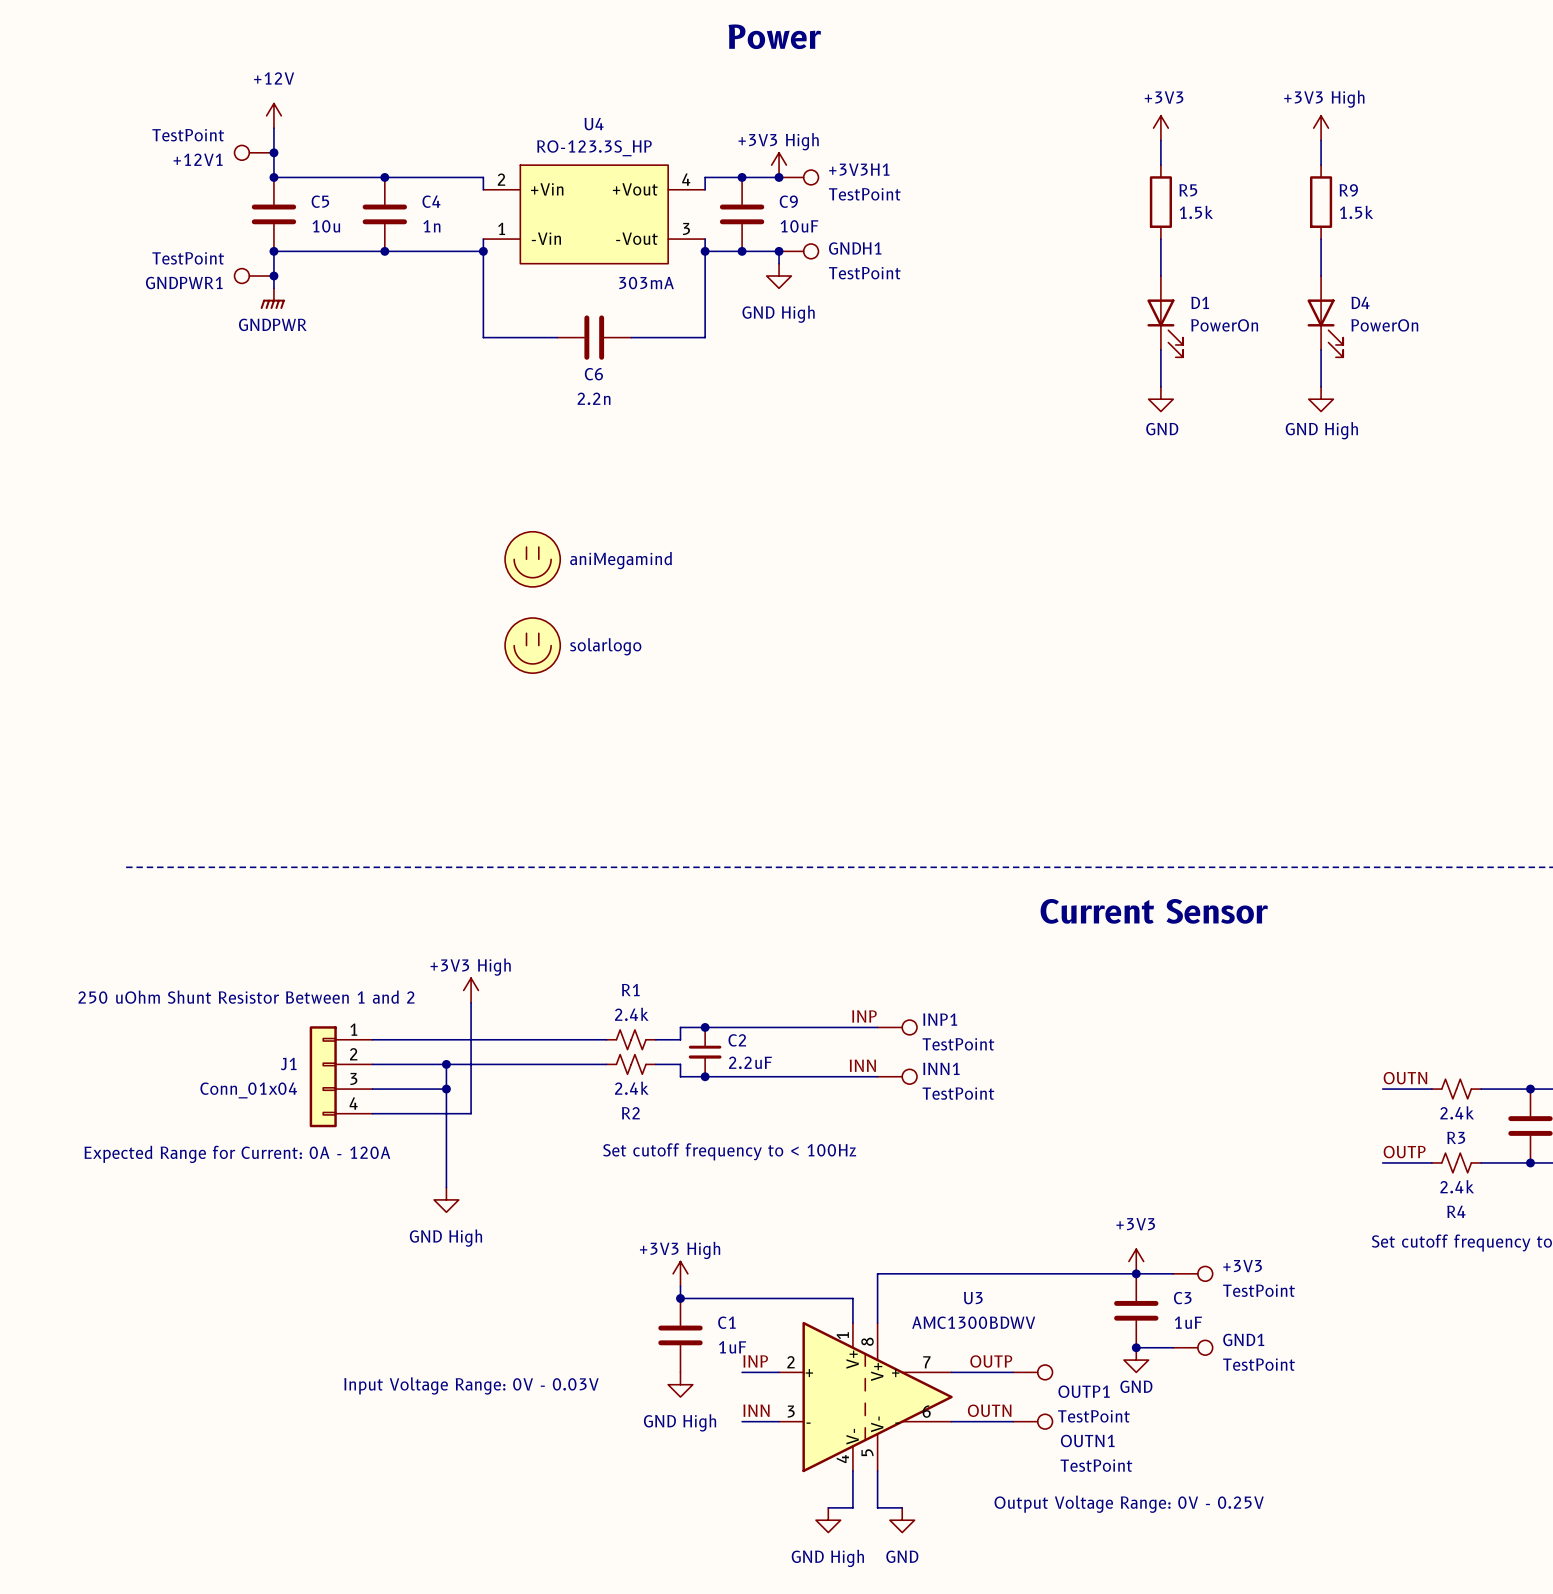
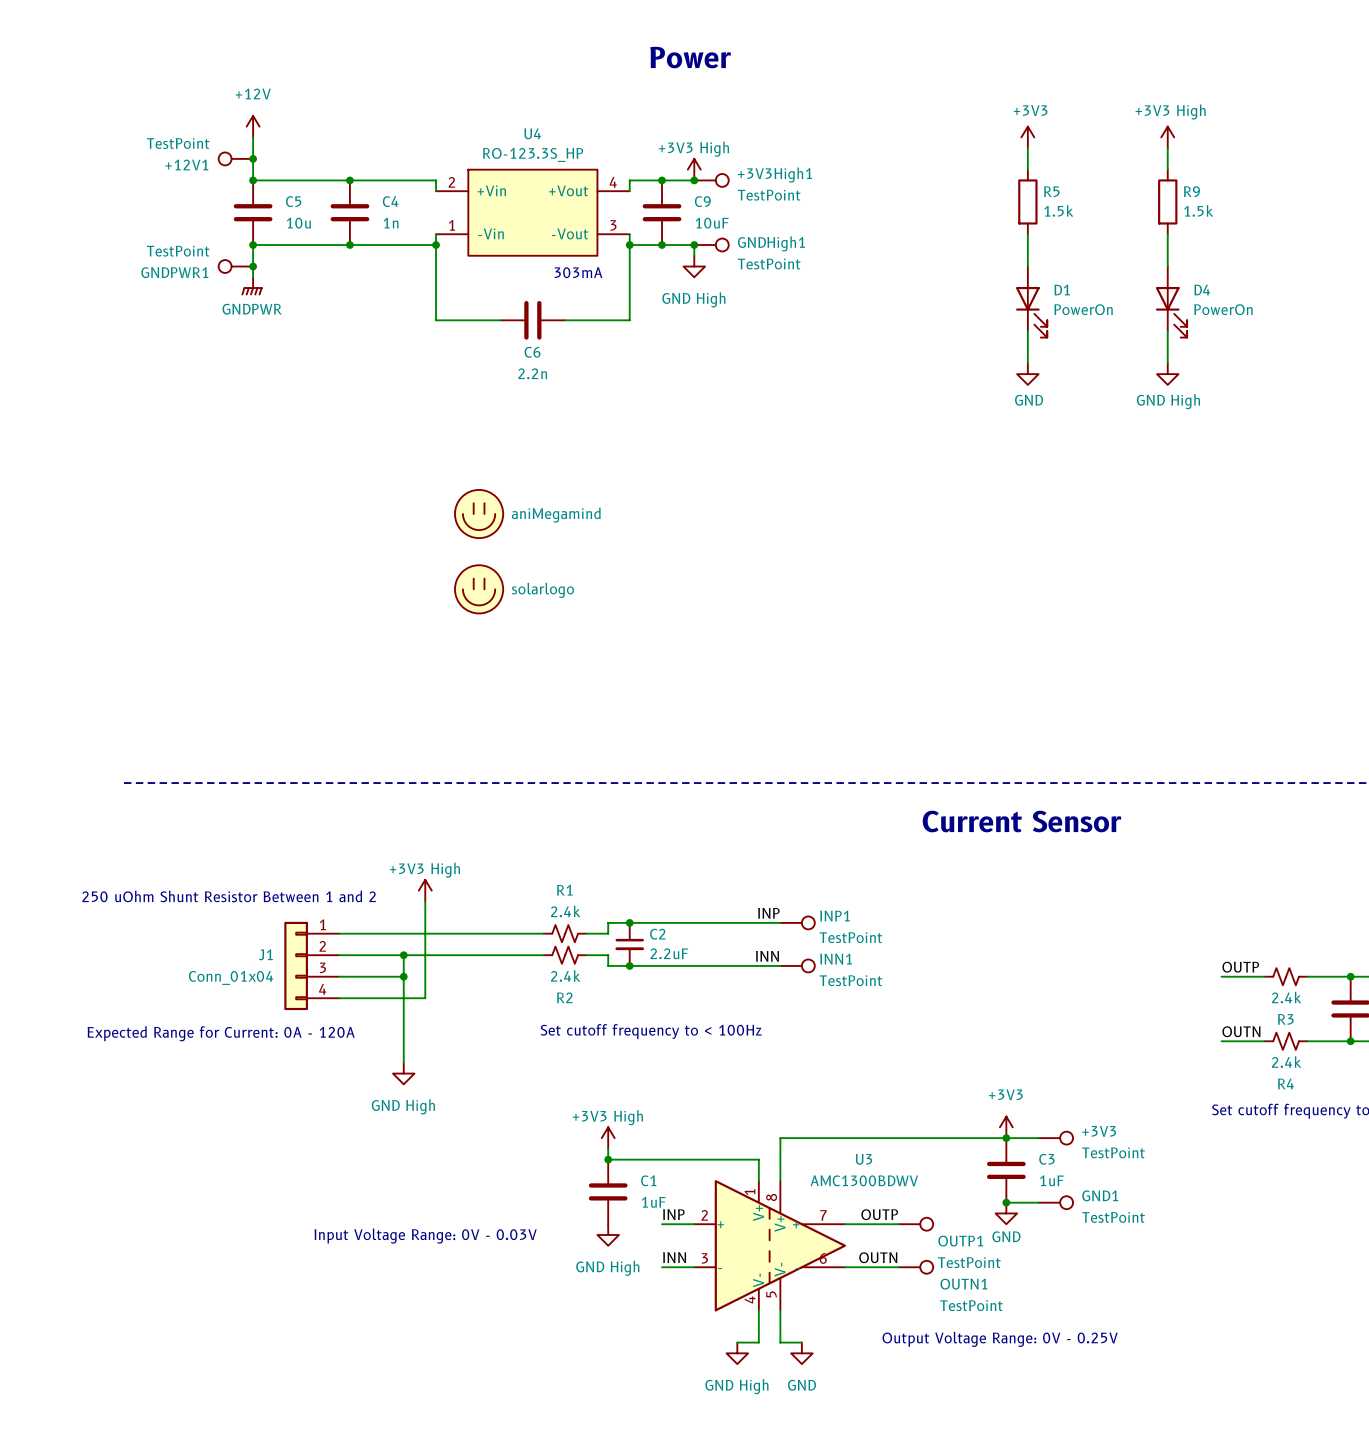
+3V3H1 name: +3V3H1 (859, 169) -> +3V3High1 (775, 175)
GNDH1 name: GNDH1 (855, 248) -> GNDHigh1 (771, 243)
label: OUTN (1405, 1078) -> OUTP (1240, 967)
label: OUTP (1404, 1152) -> OUTN (1241, 1031)

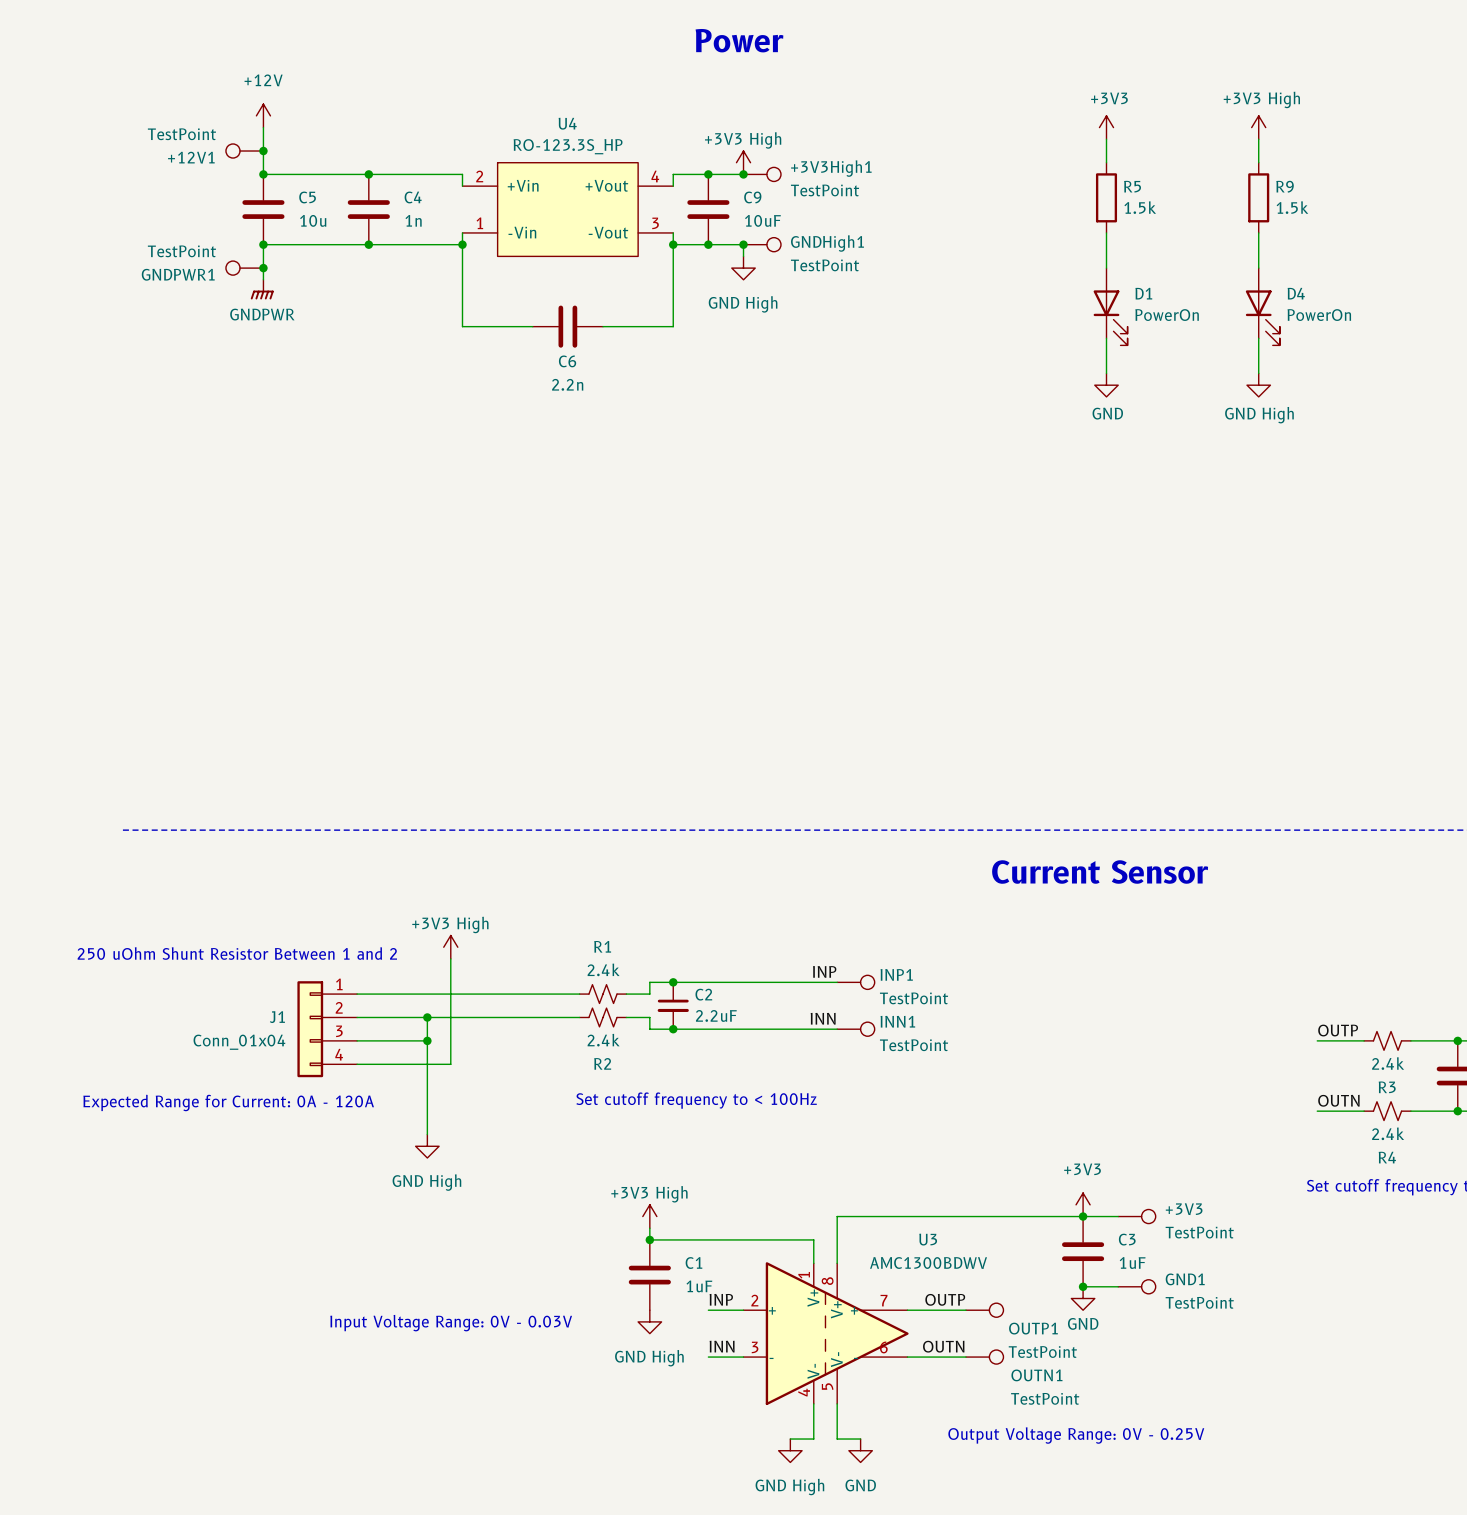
text: 303mA (578, 272) -> none
part: aniMegamind (479, 514) -> none
part: solarlogo (479, 589) -> none

